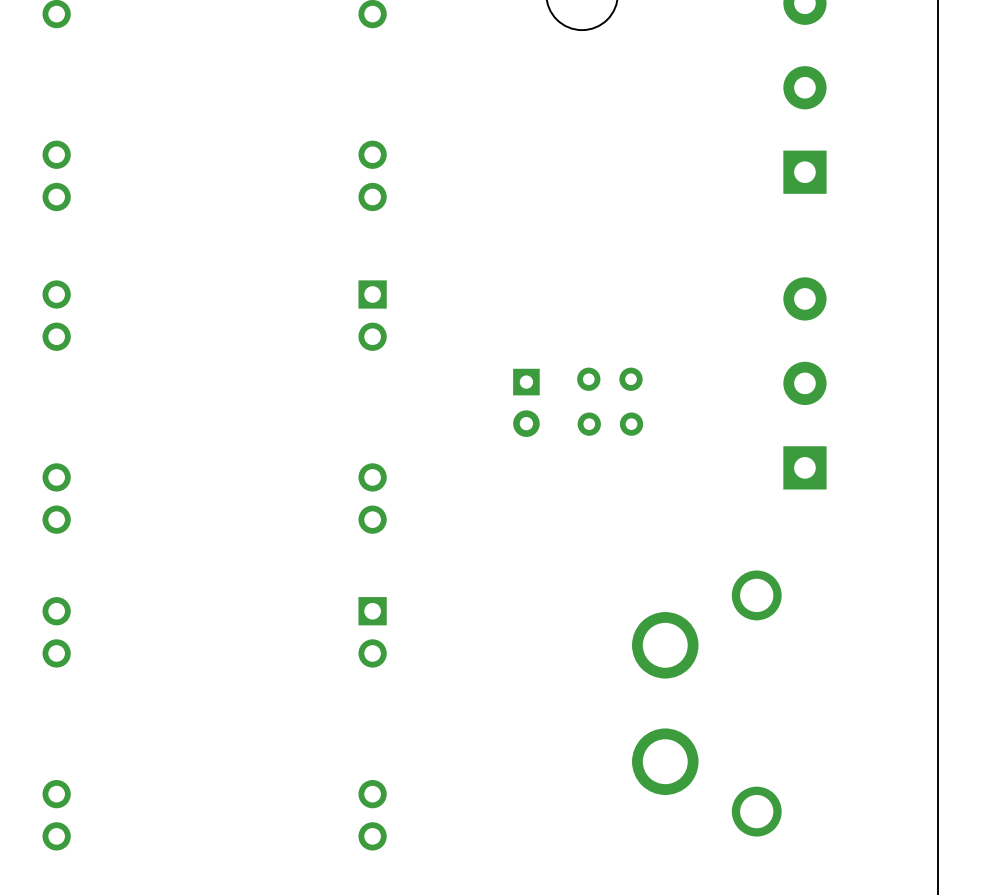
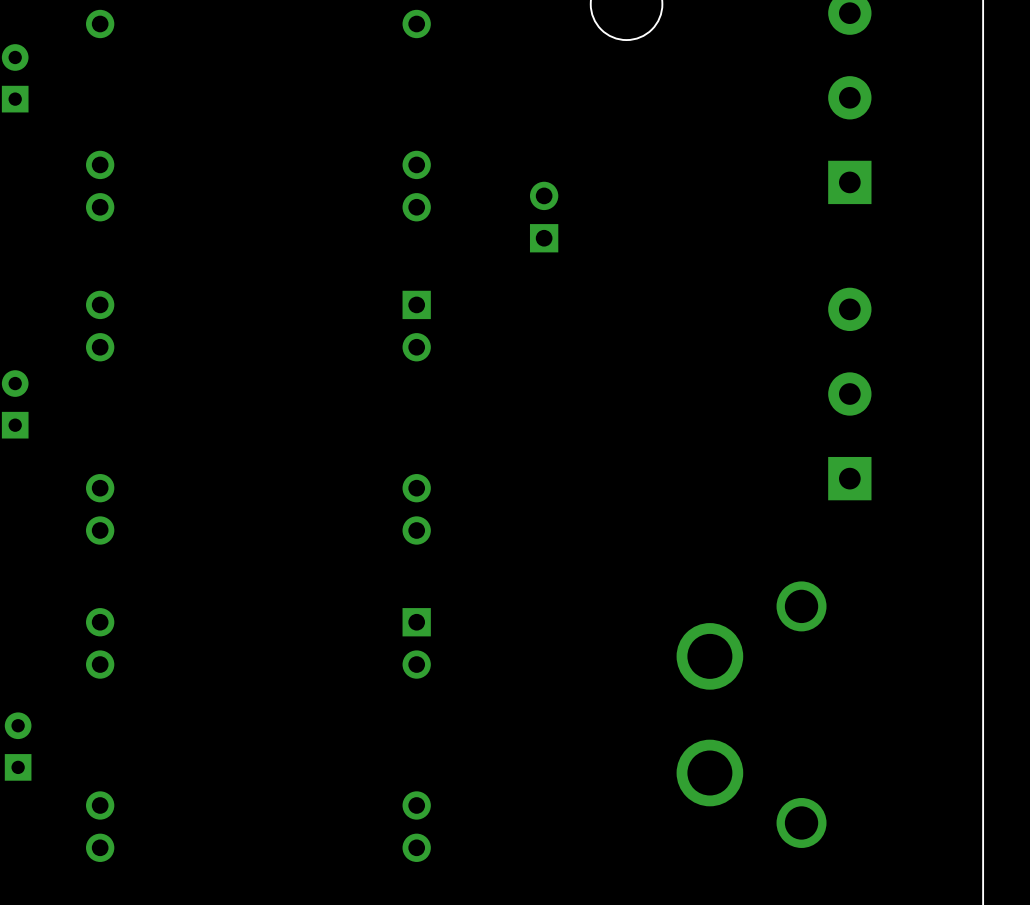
part: none -> (544, 217)
part: (609, 379) -> none
part: (526, 402) -> none
part: (610, 424) -> none

